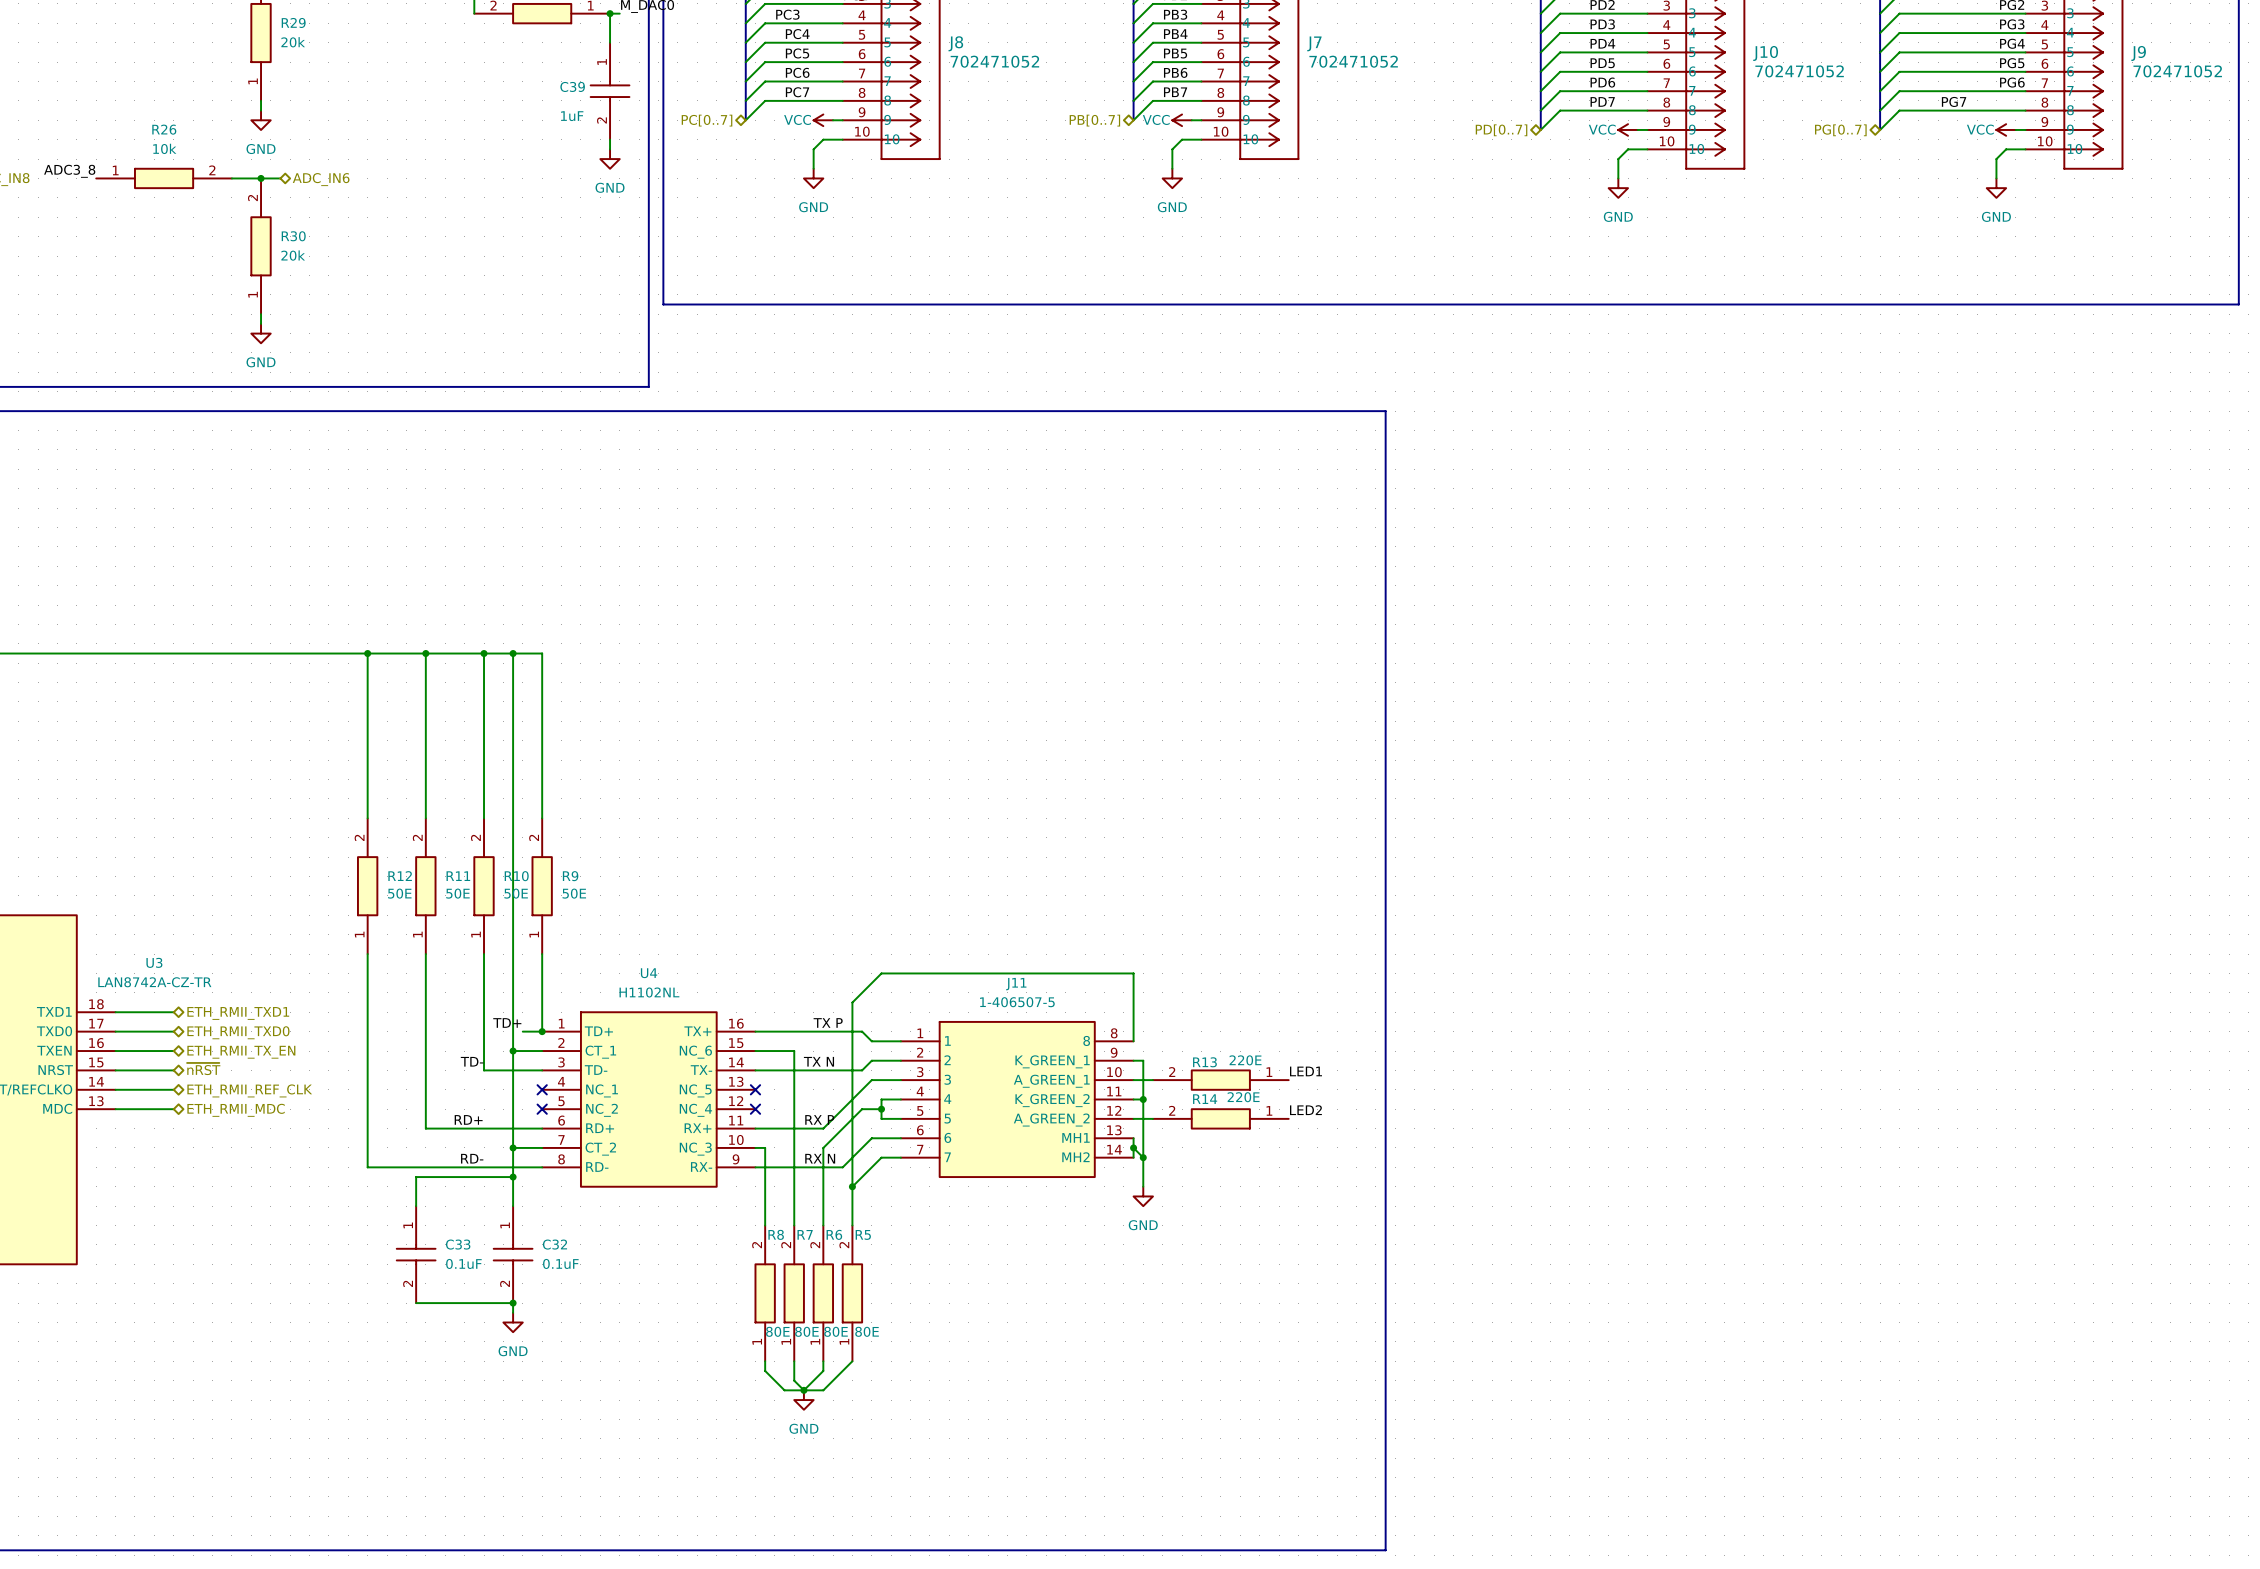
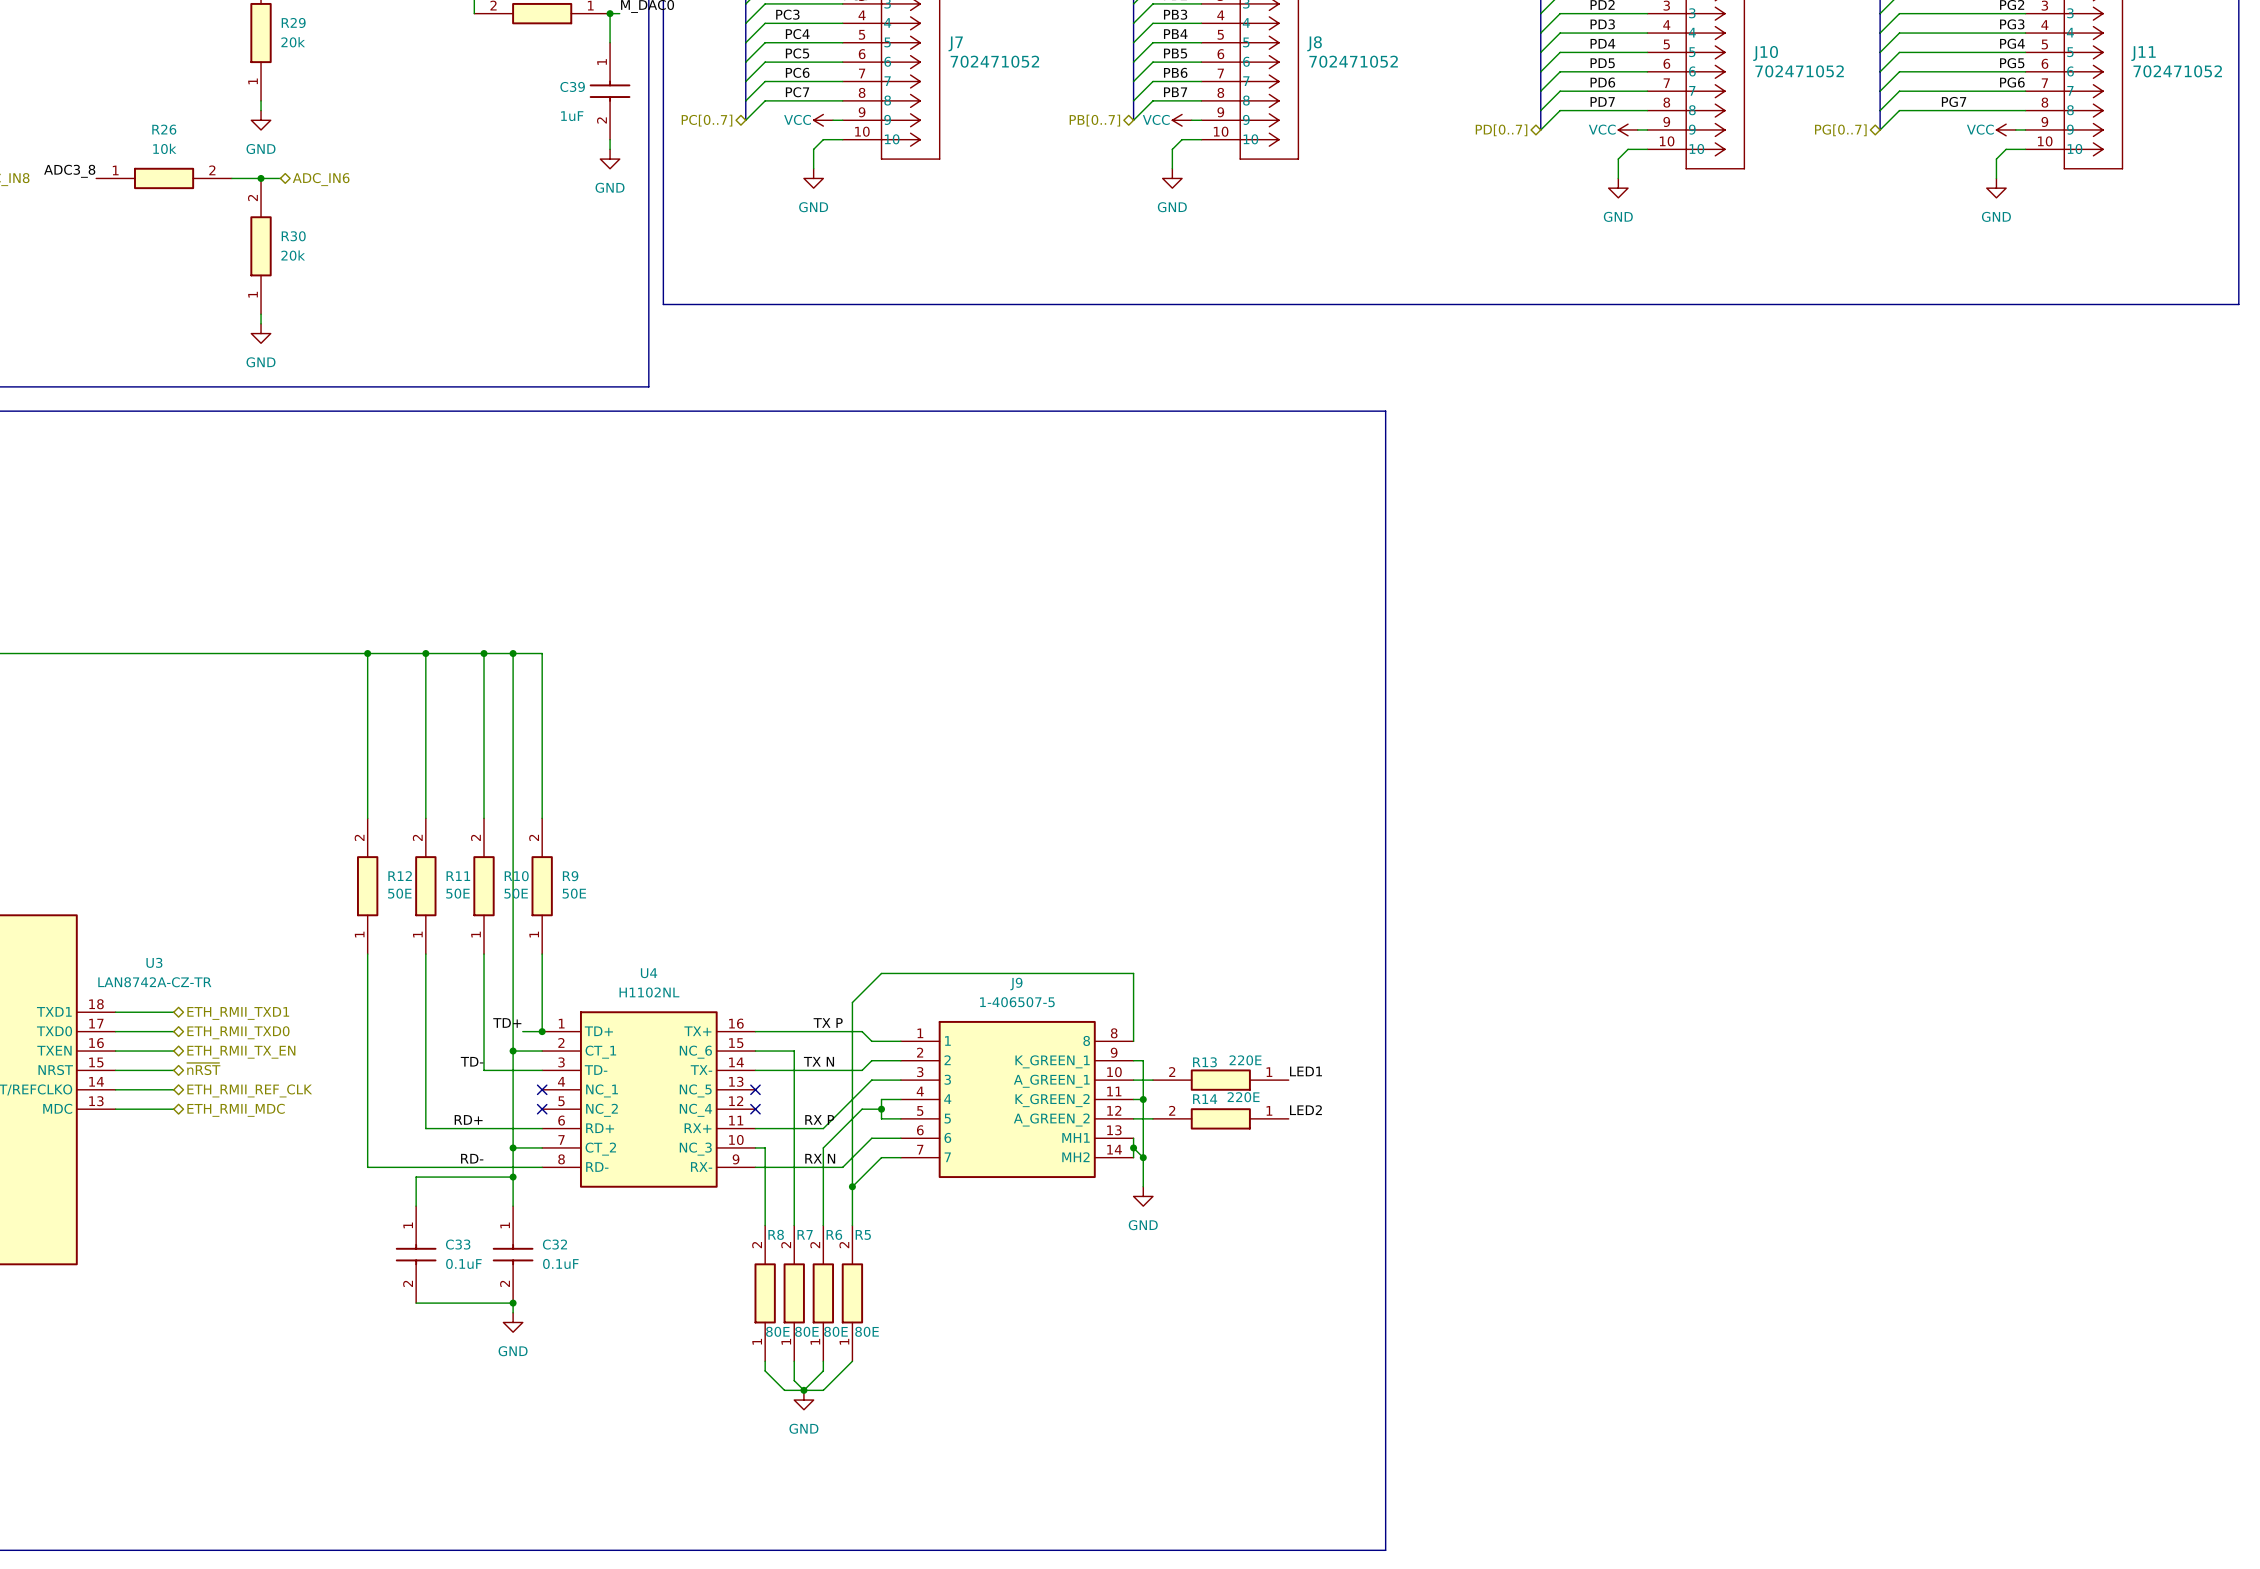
J8 name: J8 (955, 43) -> J7 (955, 43)
J7 name: J7 (1314, 43) -> J8 (1314, 43)
J9 name: J9 (2138, 53) -> J11 (2143, 53)
J11 name: J11 (1016, 984) -> J9 (1016, 984)

